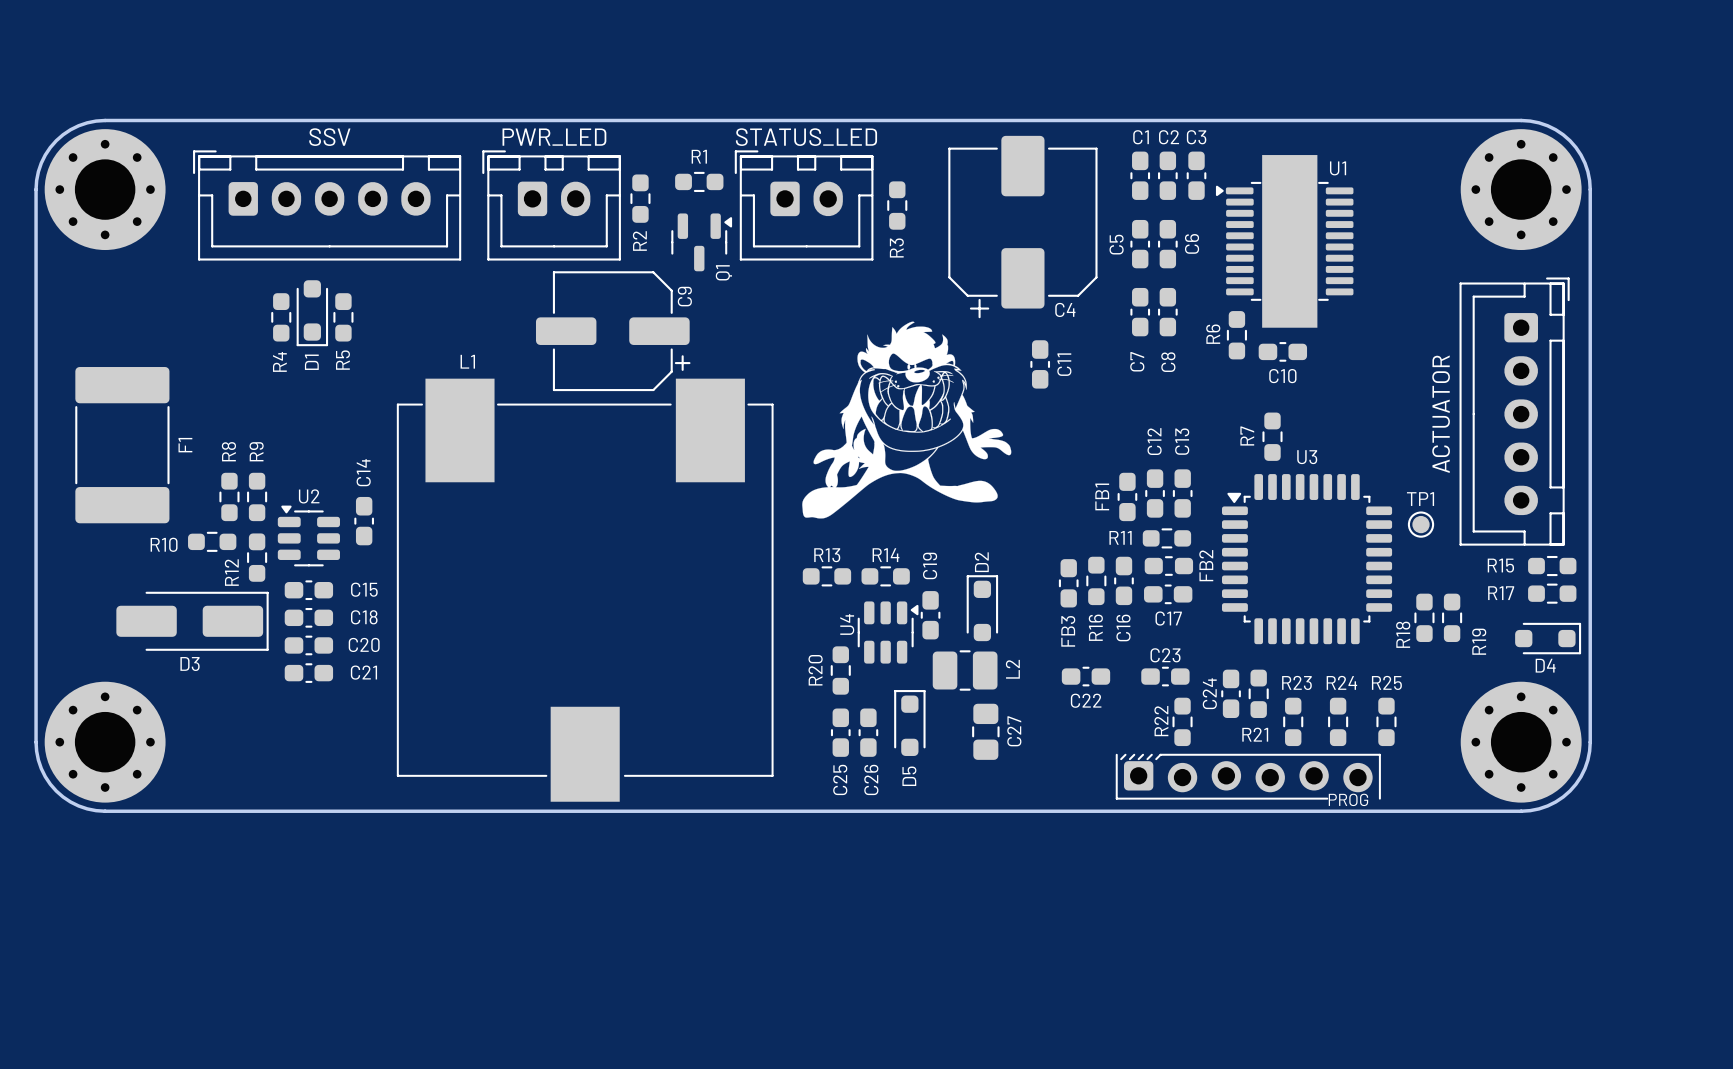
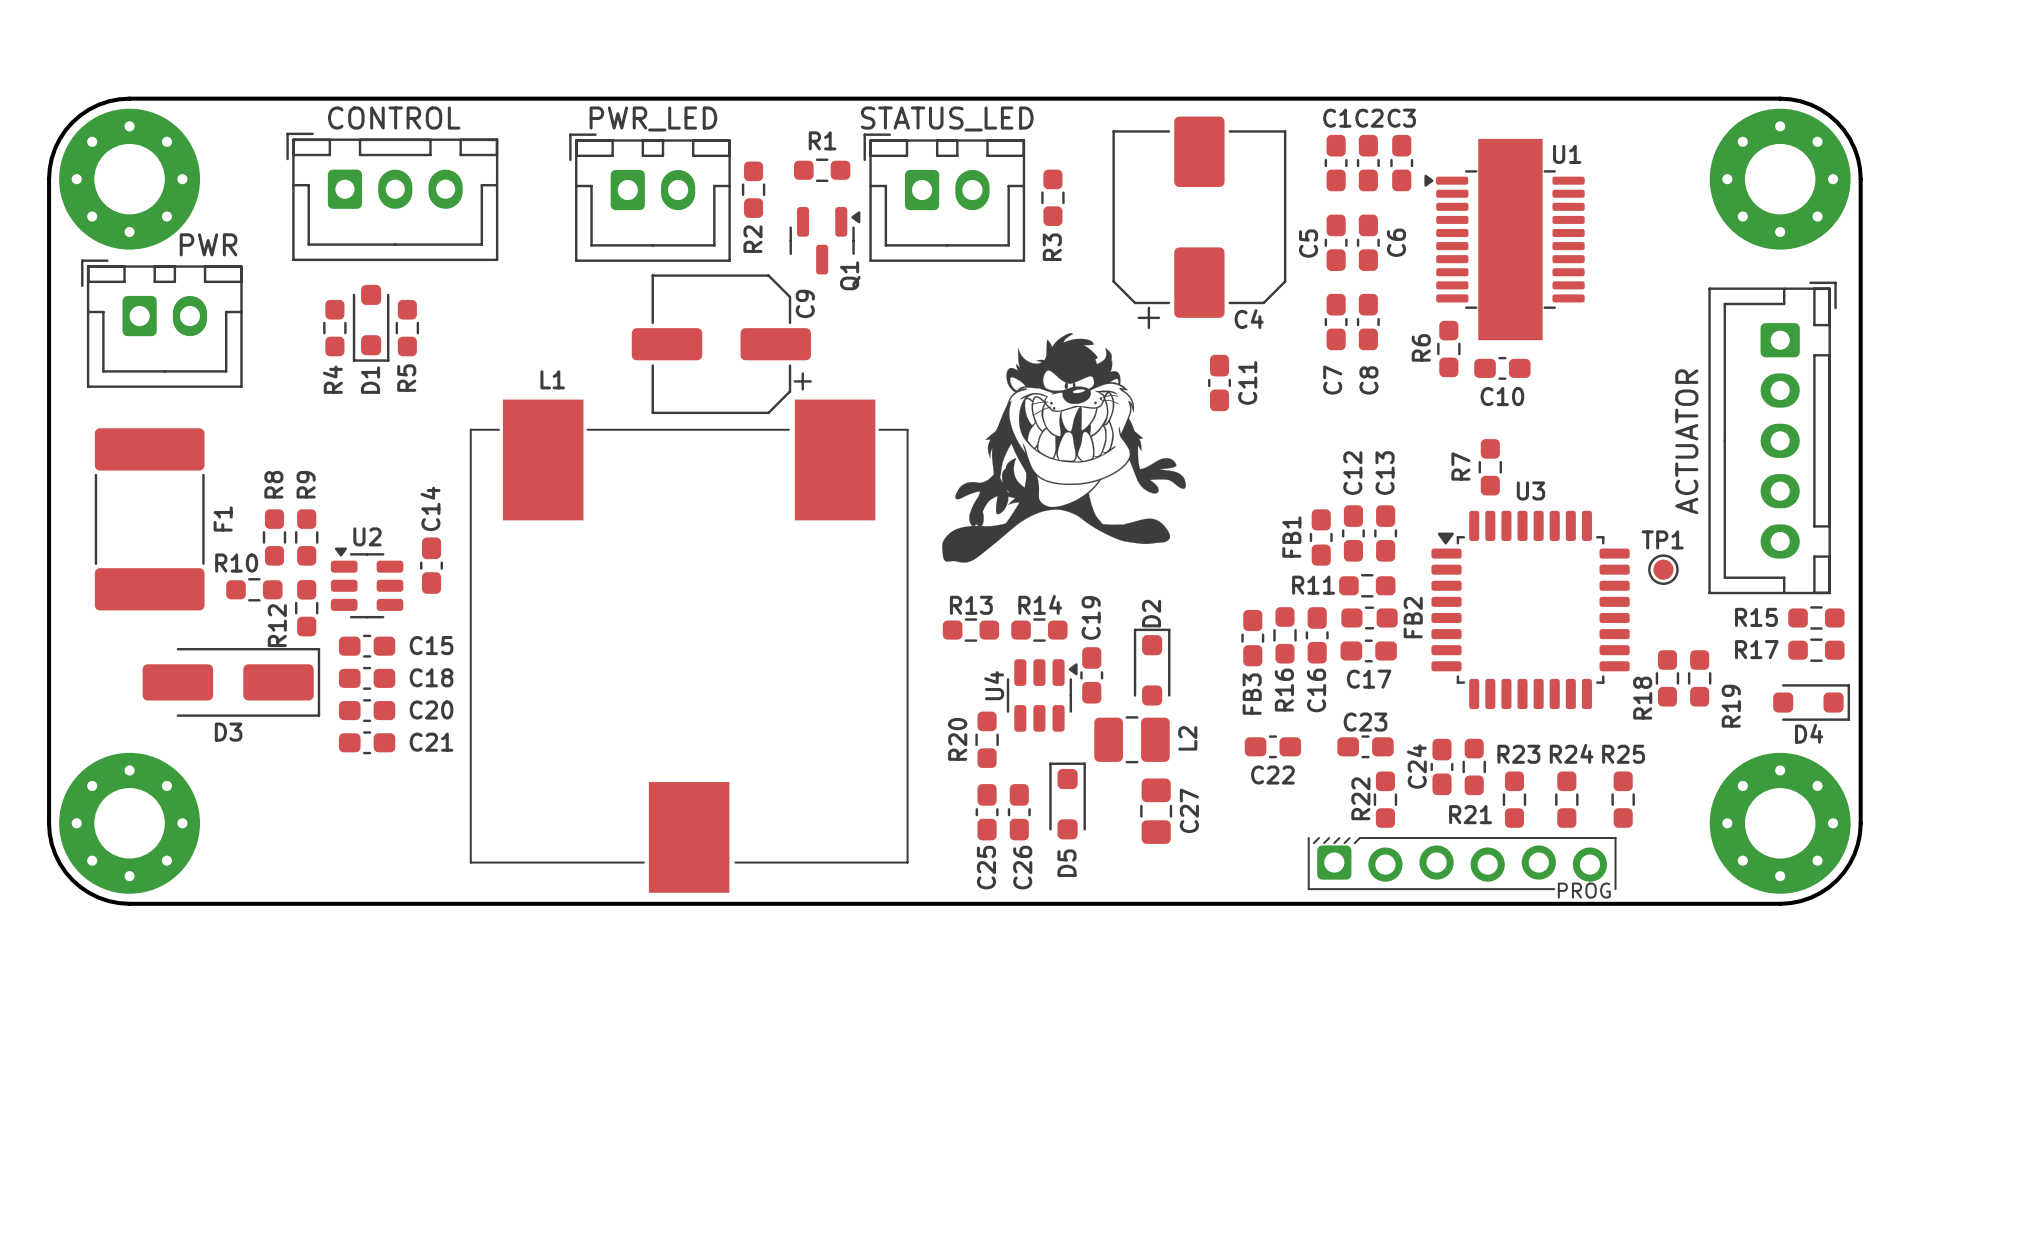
part value: SSV (329, 137) -> CONTROL (394, 118)
part footprint: [193, 150, 462, 261] -> [286, 132, 499, 262]
part: none -> PWR (161, 323)
F1 position: (122, 445) -> (149, 519)
R10 name position: R10 (164, 544) -> R10 (236, 563)

